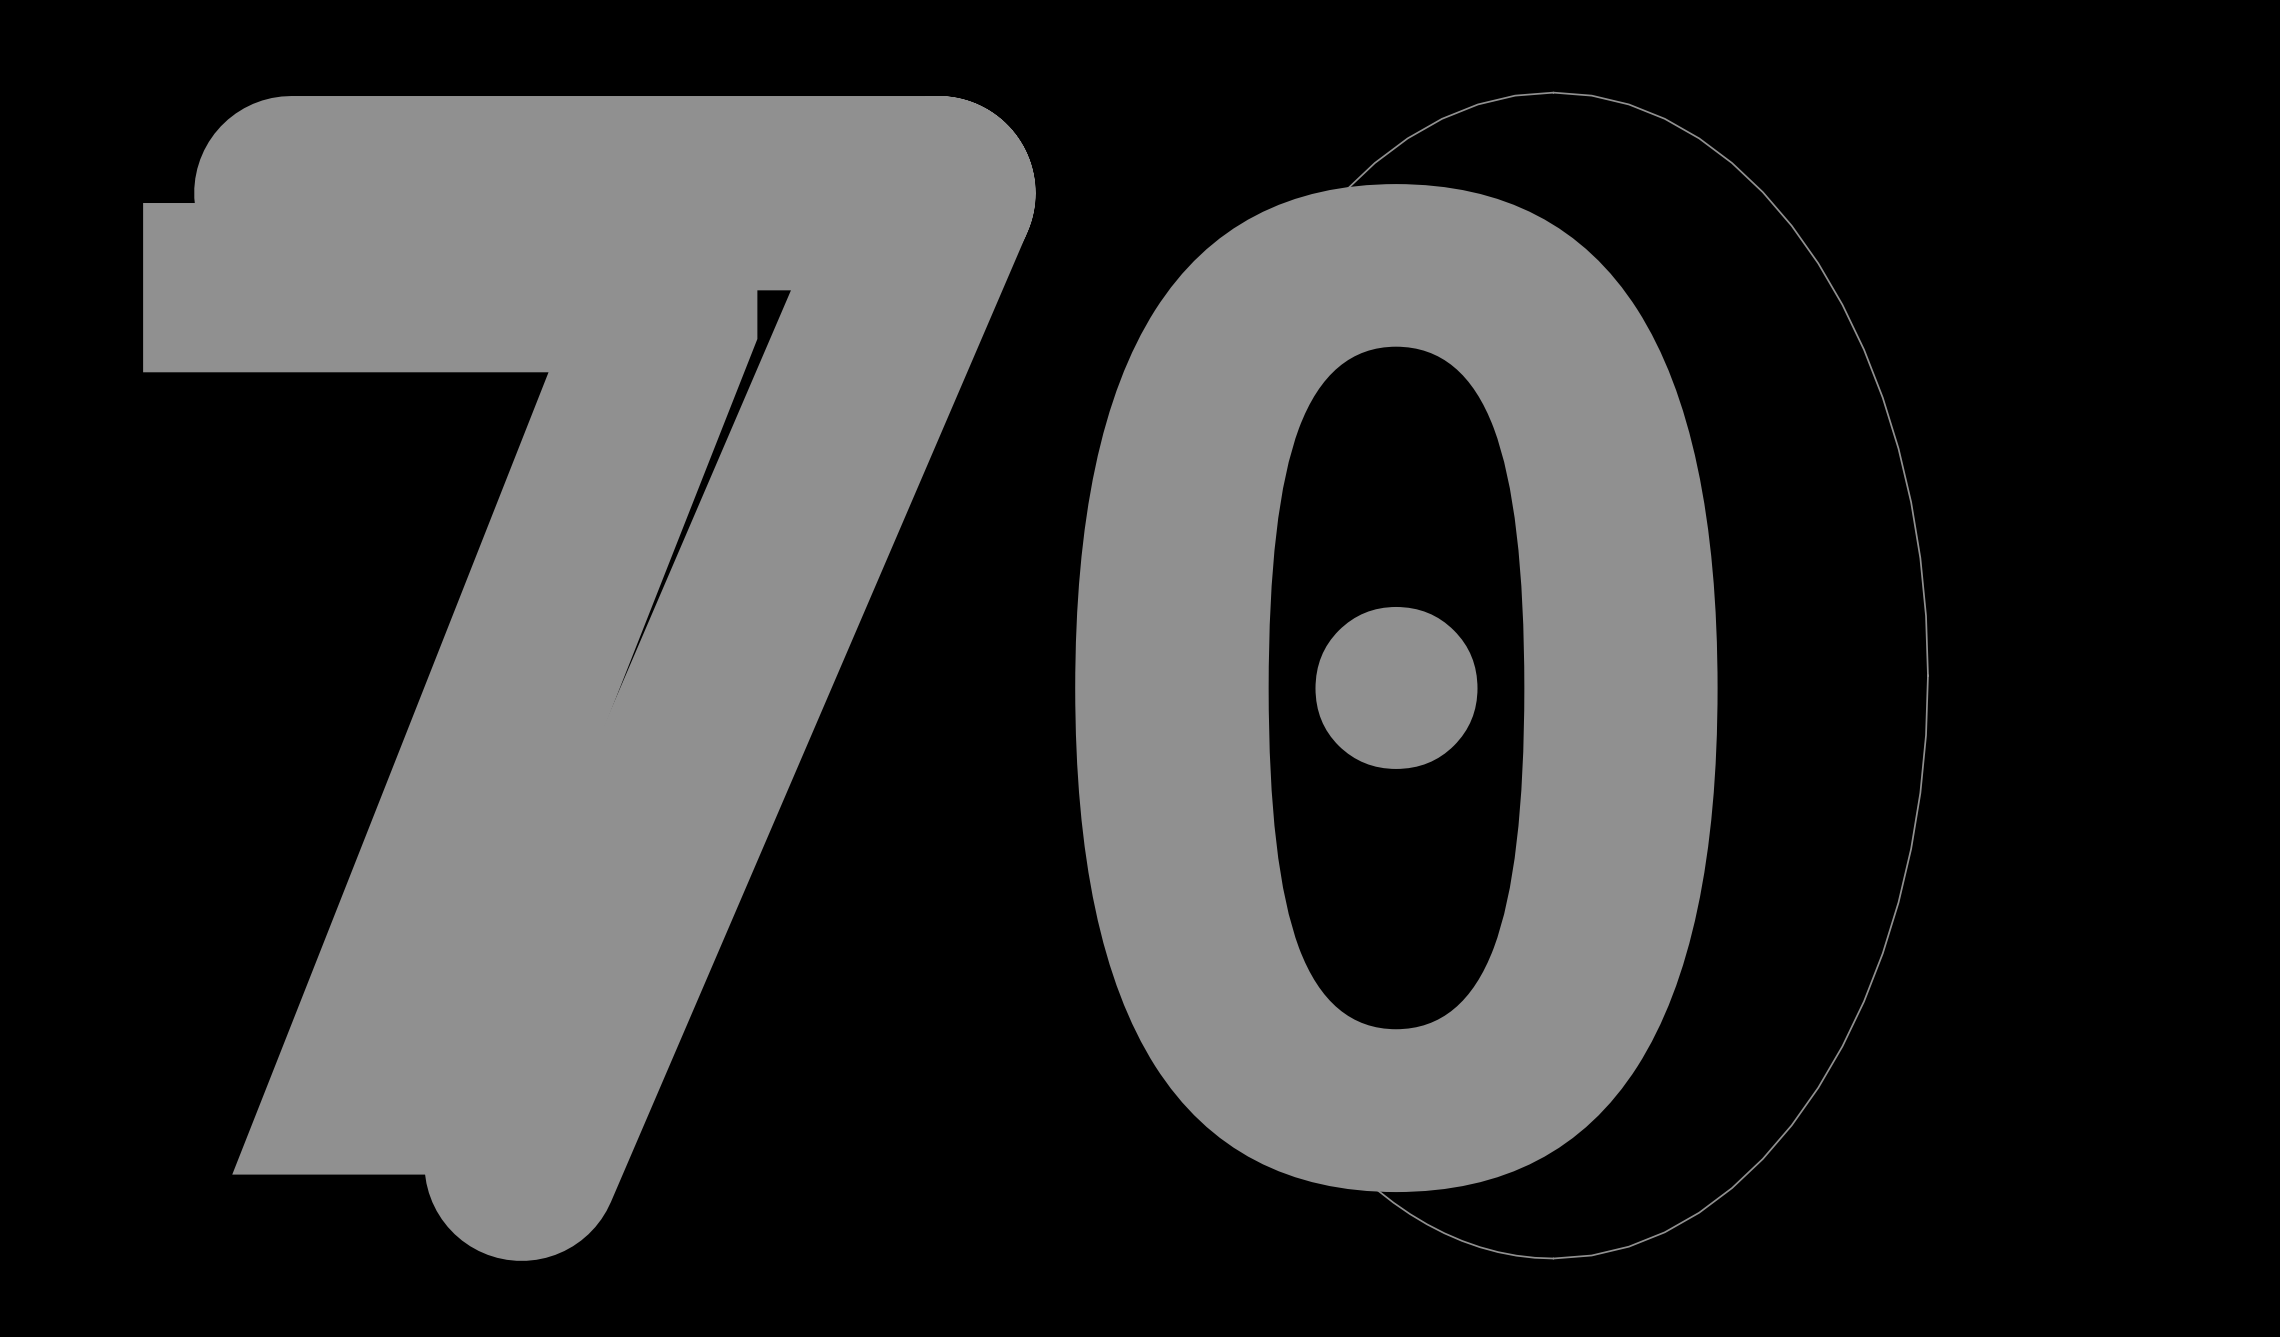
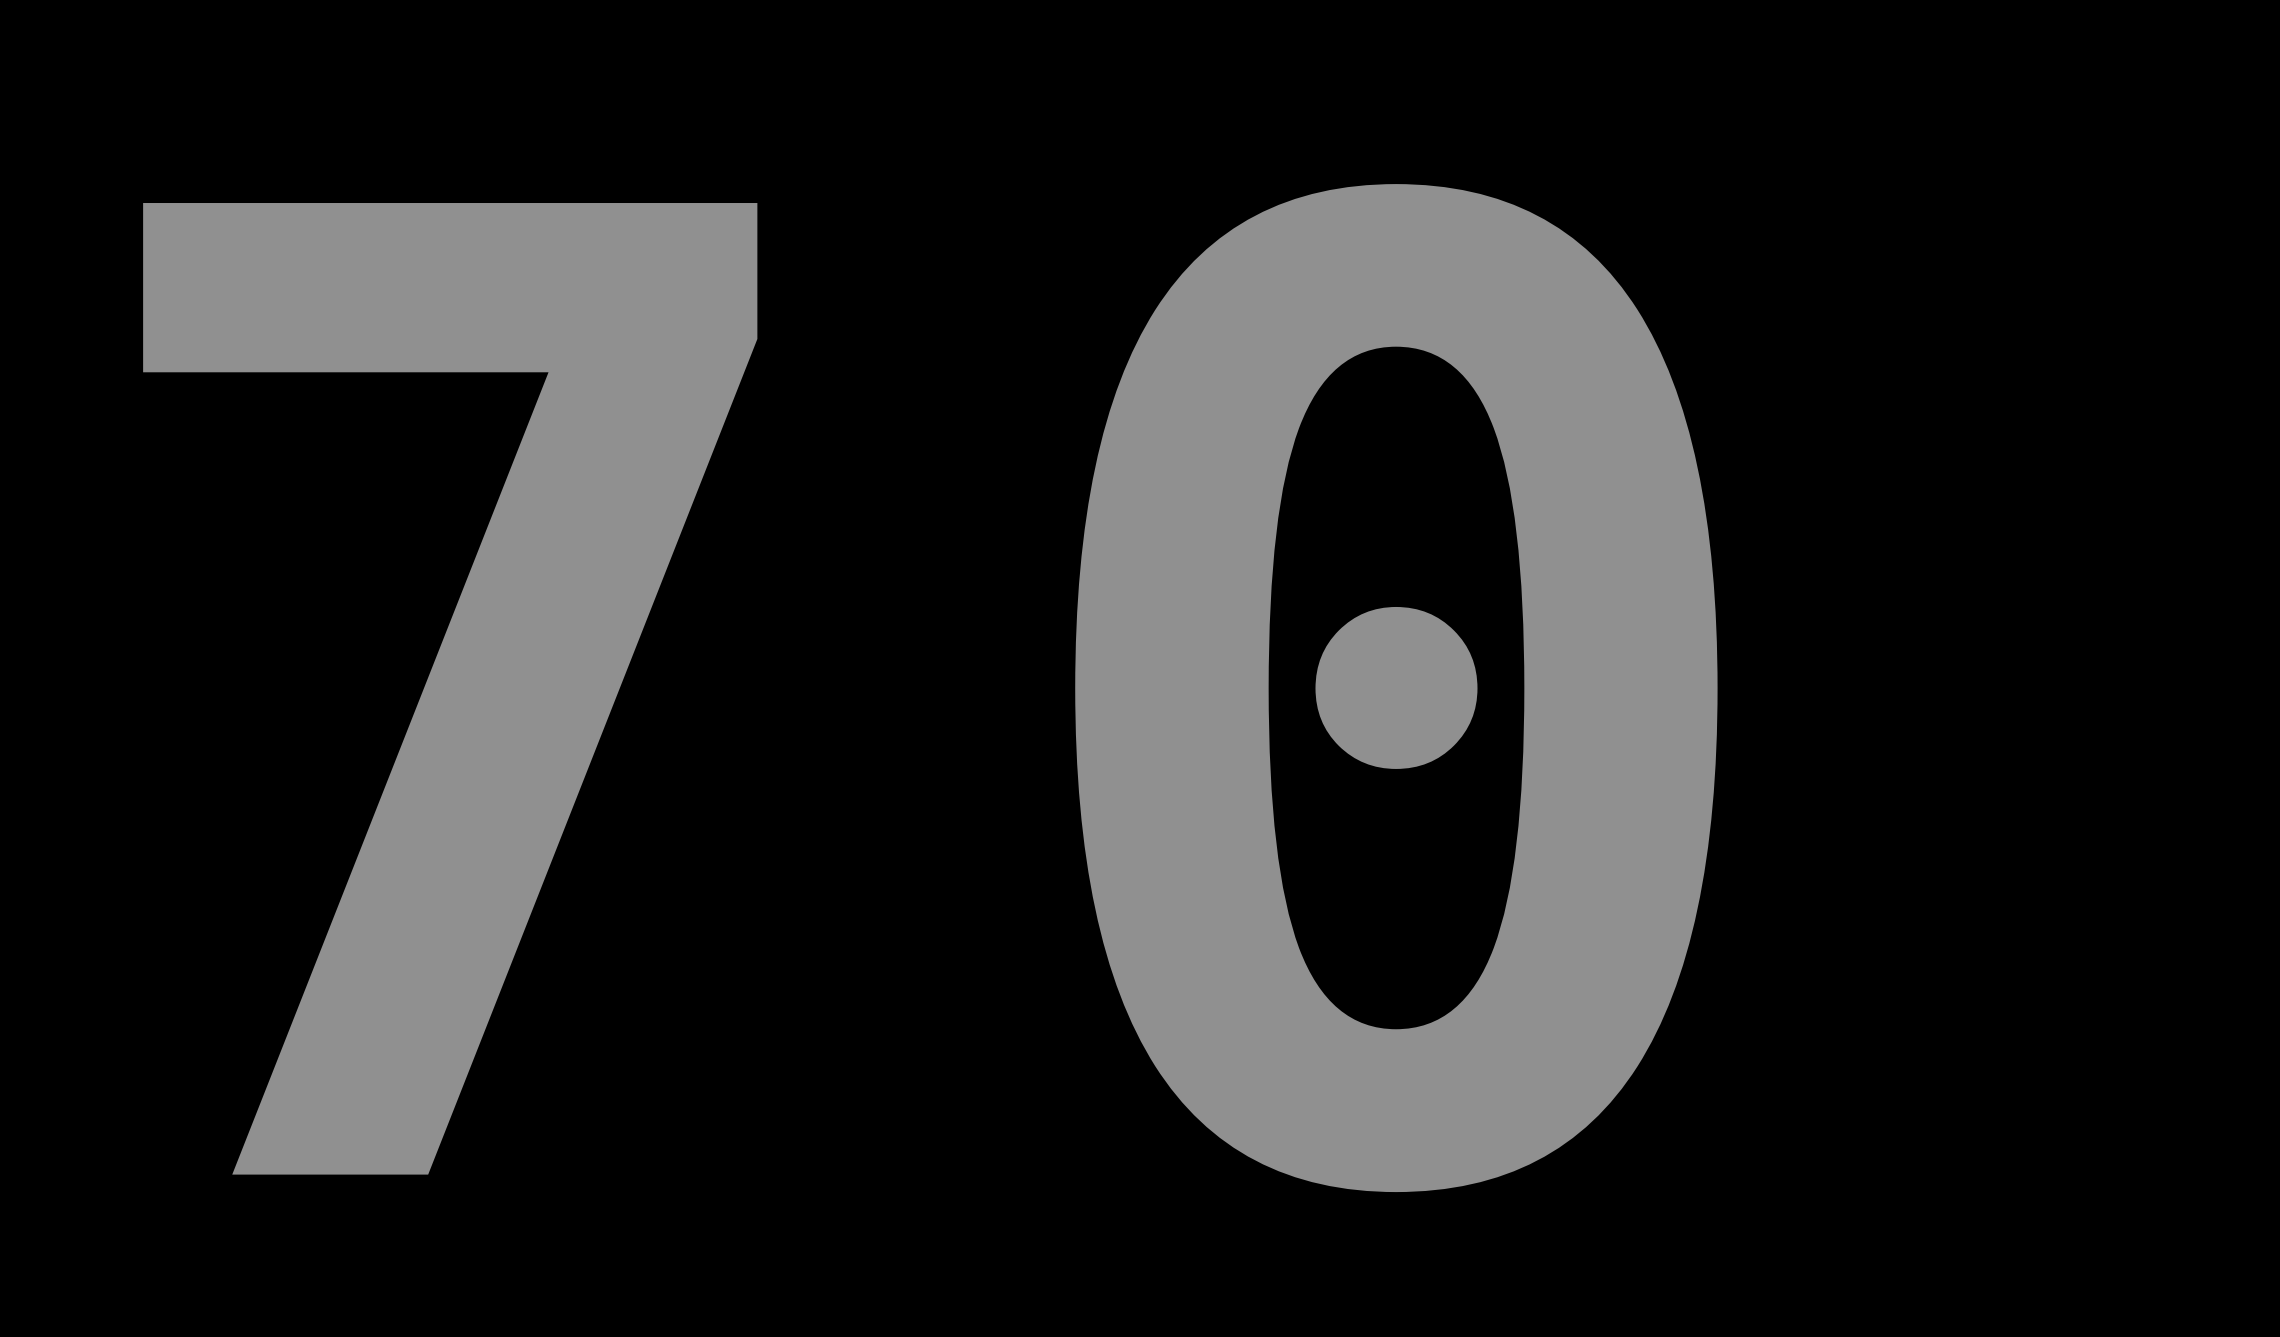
line: (1553, 92) (1515, 95) (1477, 104) (1442, 118) (1407, 138) (1374, 162) (1344, 192) (1315, 225) (1288, 263) (1264, 304) (1242, 349) (1224, 397) (1208, 448) (1195, 502) (1186, 558) (1180, 615) (1178, 675) (1180, 733) (1186, 789) (1195, 845) (1207, 898) (1222, 950) (1241, 998) (1263, 1045) (1288, 1087) (1316, 1126) (1345, 1160) (1377, 1189) (1410, 1214) (1444, 1233) (1480, 1247) (1516, 1255) (1553, 1258) (1591, 1255) (1628, 1246) (1664, 1232) (1699, 1212) (1731, 1188) (1762, 1158) (1791, 1125) (1818, 1087) (1842, 1046) (1863, 1001) (1882, 953) (1898, 902) (1911, 848) (1920, 793) (1926, 735) (1927, 675) (1926, 615) (1920, 558) (1911, 502) (1898, 448) (1882, 397) (1863, 349) (1842, 304) (1818, 263) (1791, 225) (1762, 192) (1731, 162) (1699, 138) (1664, 118) (1628, 104) (1591, 95) (1553, 92) -> none
line: (291, 193) (938, 193) (521, 1163) -> none

